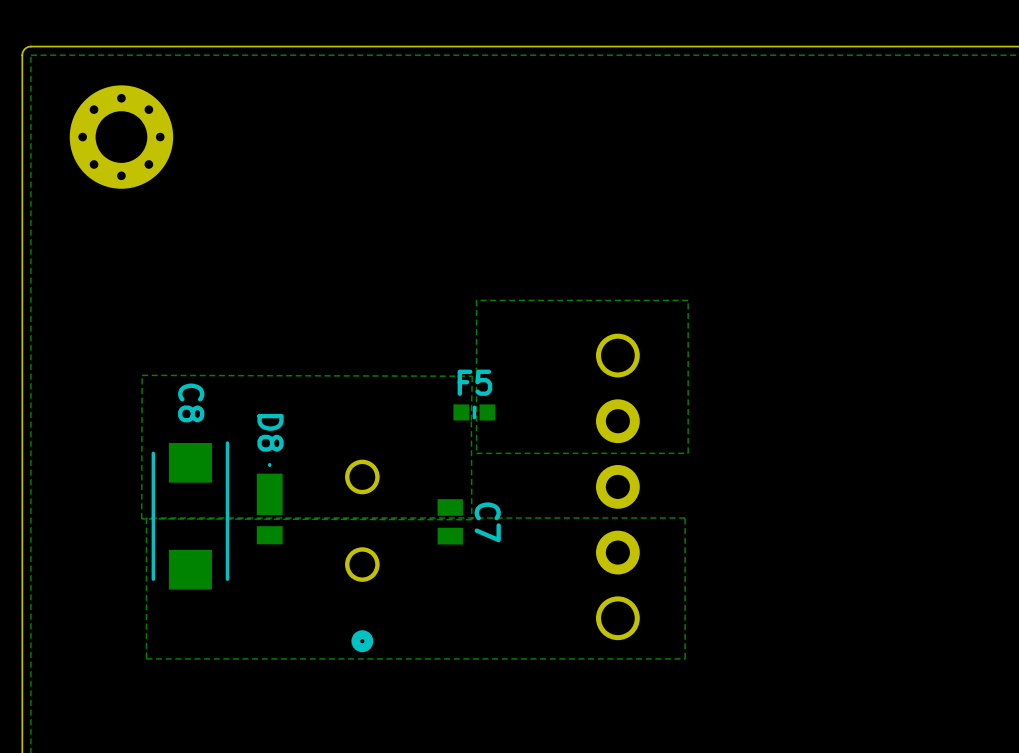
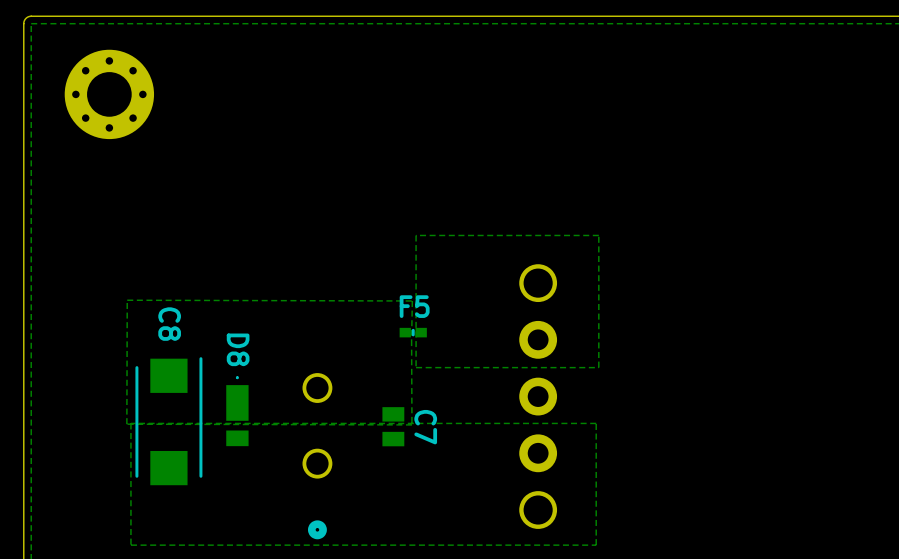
F5 footprint: [453, 404, 496, 421] -> [399, 327, 427, 338]

